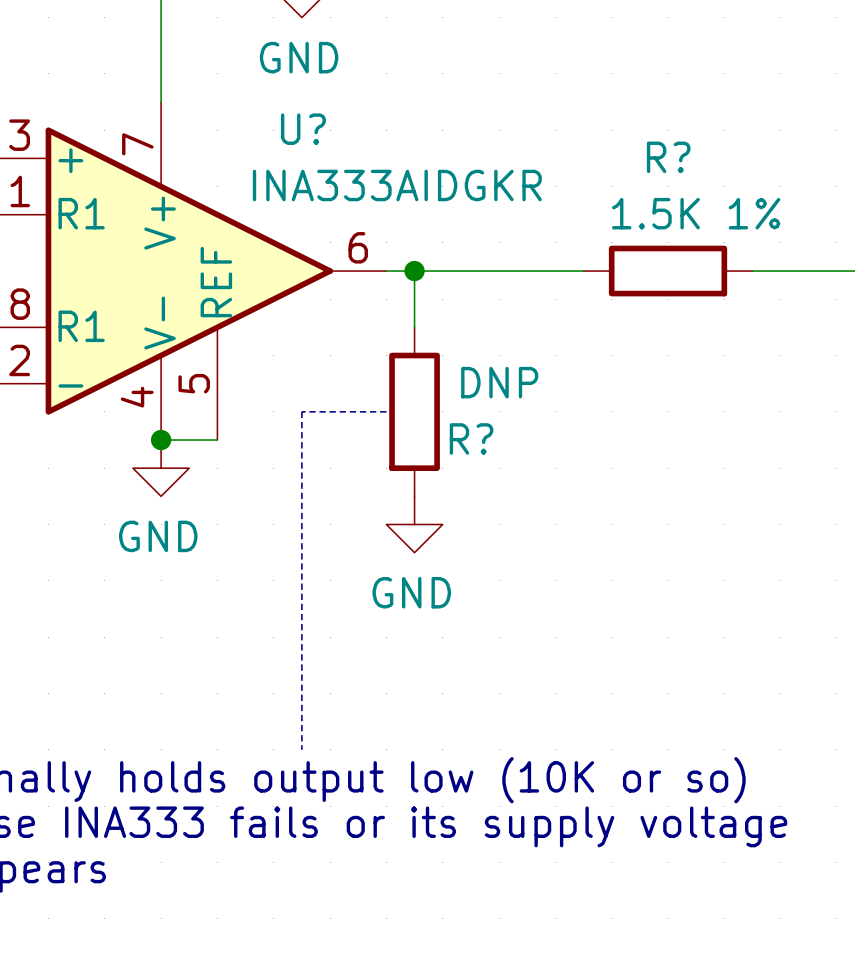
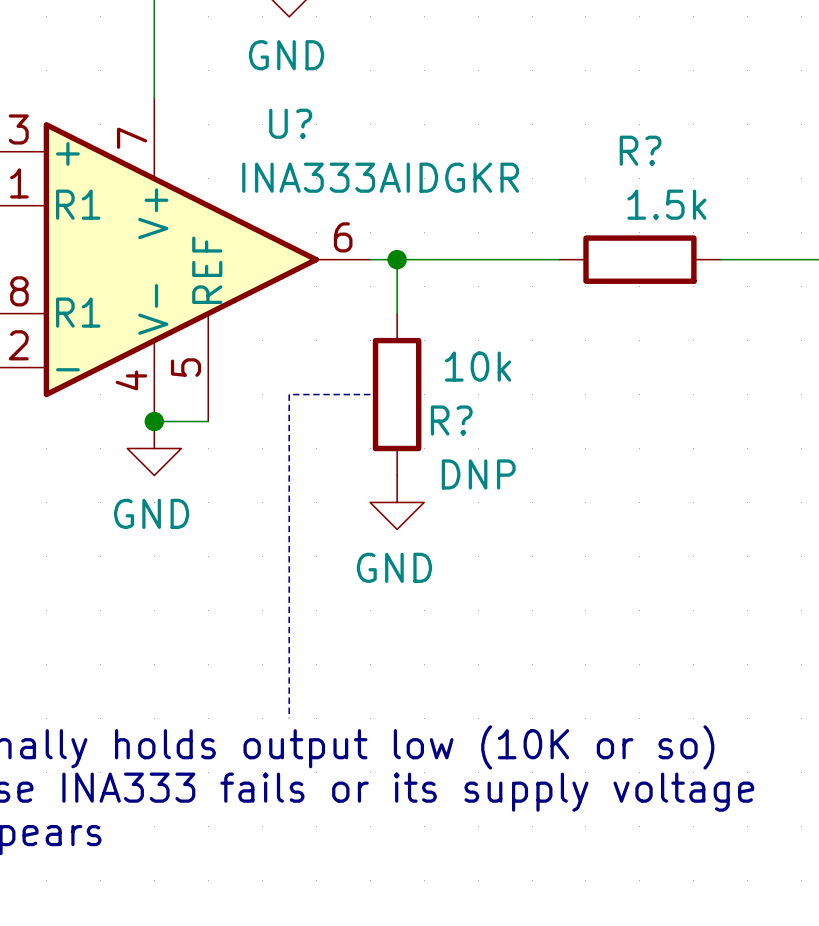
R? value: 1.5K 1% (696, 213) -> 1.5k (666, 204)
R? value: DNP (499, 382) -> 10k (478, 366)
R? text: none -> DNP (478, 474)

